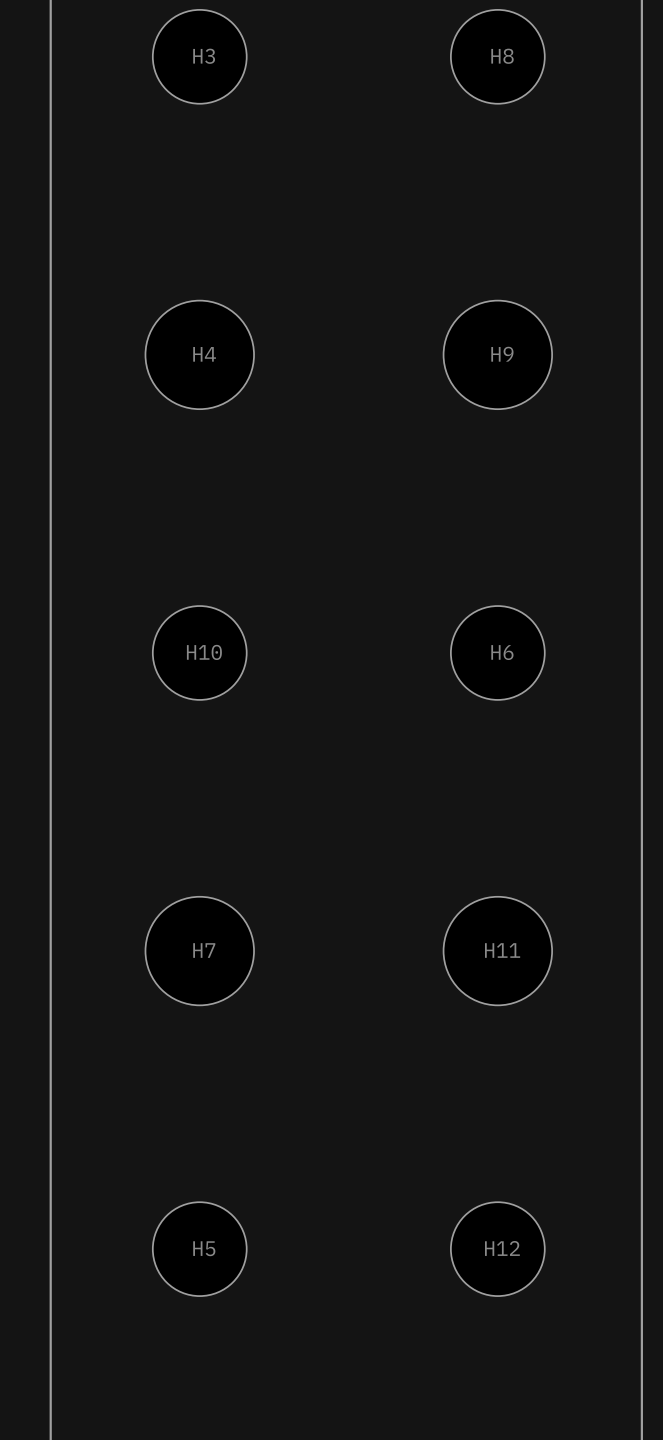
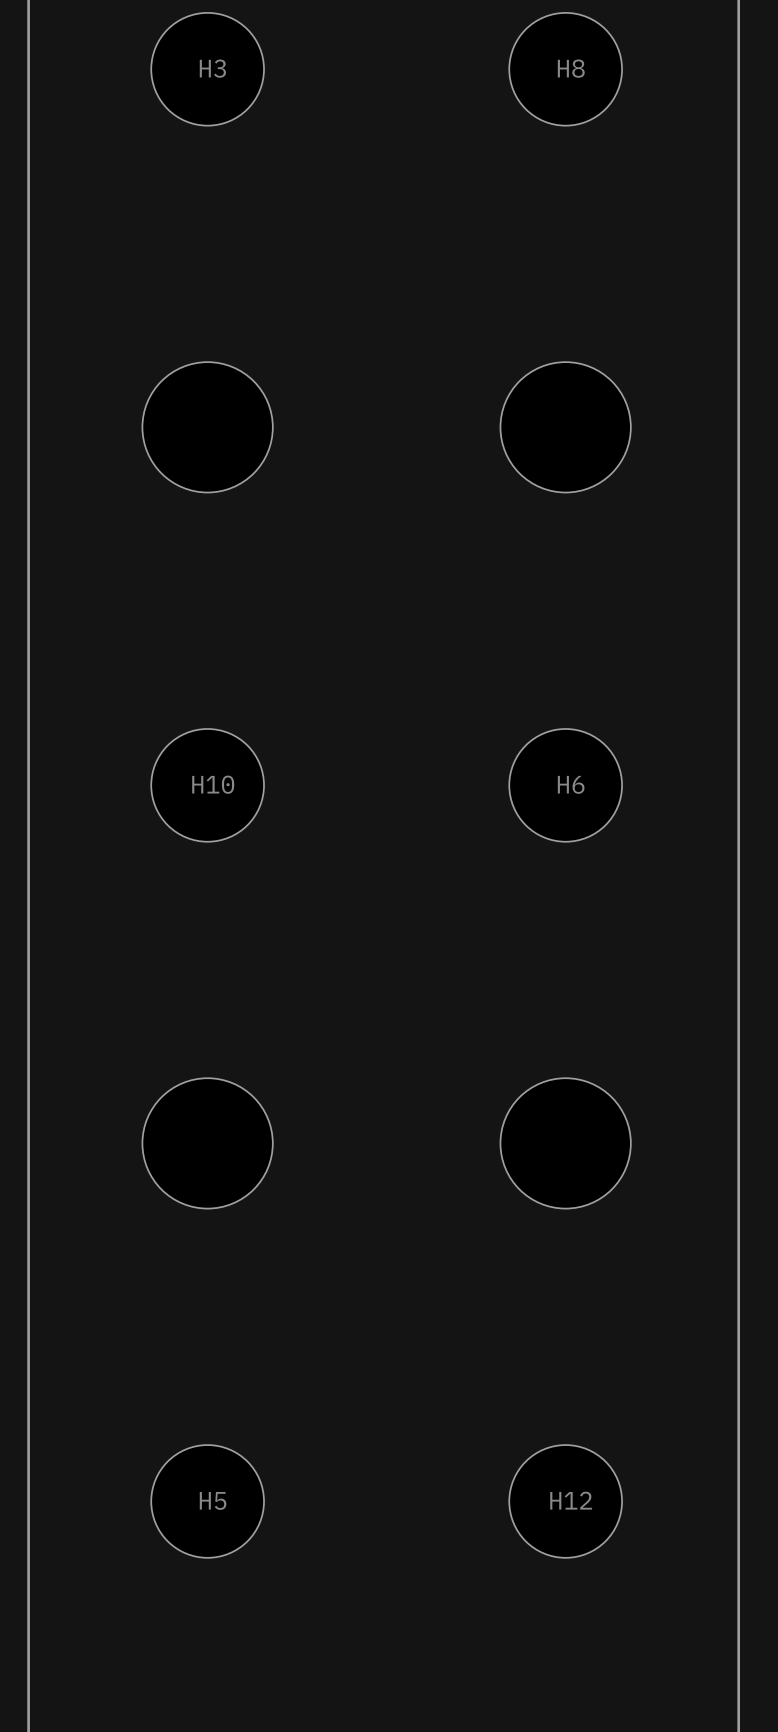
H4 name: H4 (204, 354) -> none
H9 name: H9 (502, 354) -> none
H7 name: H7 (204, 950) -> none
H11 name: H11 (502, 950) -> none

